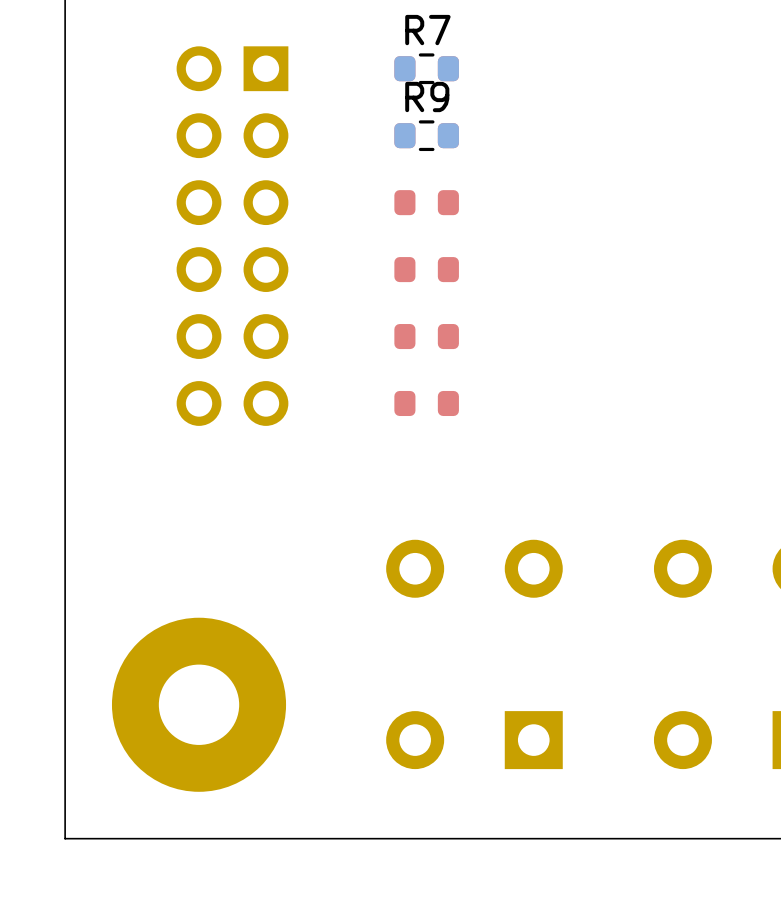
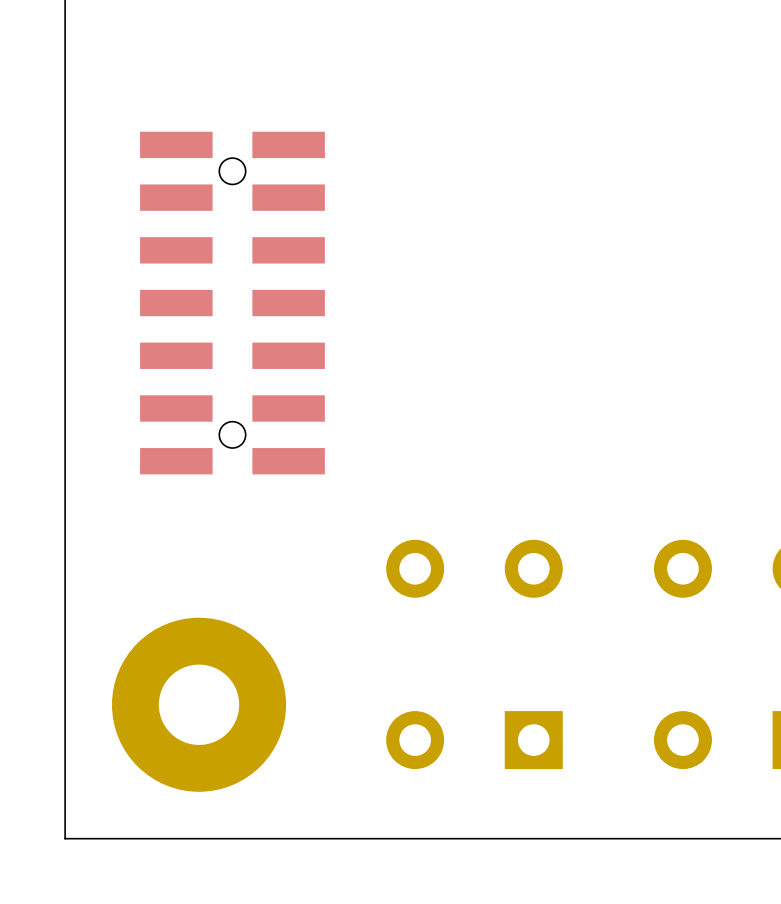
R7: (426, 68) -> none
R9: (426, 135) -> none
part: (426, 202) -> none
part: (232, 236) -> none
part: (426, 269) -> none
part: none -> (232, 303)
part: (426, 336) -> none
part: (426, 403) -> none

